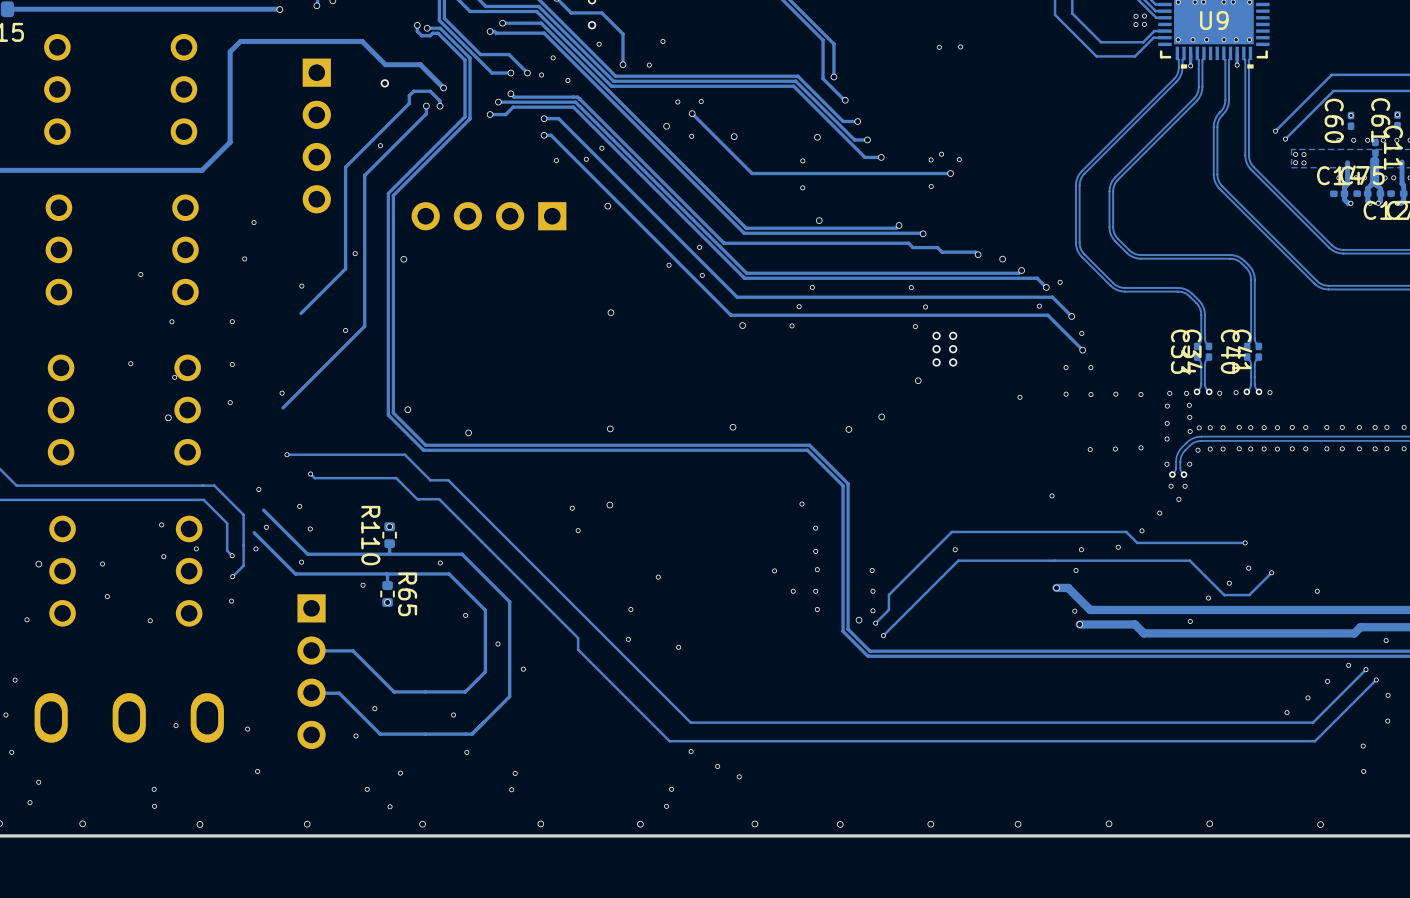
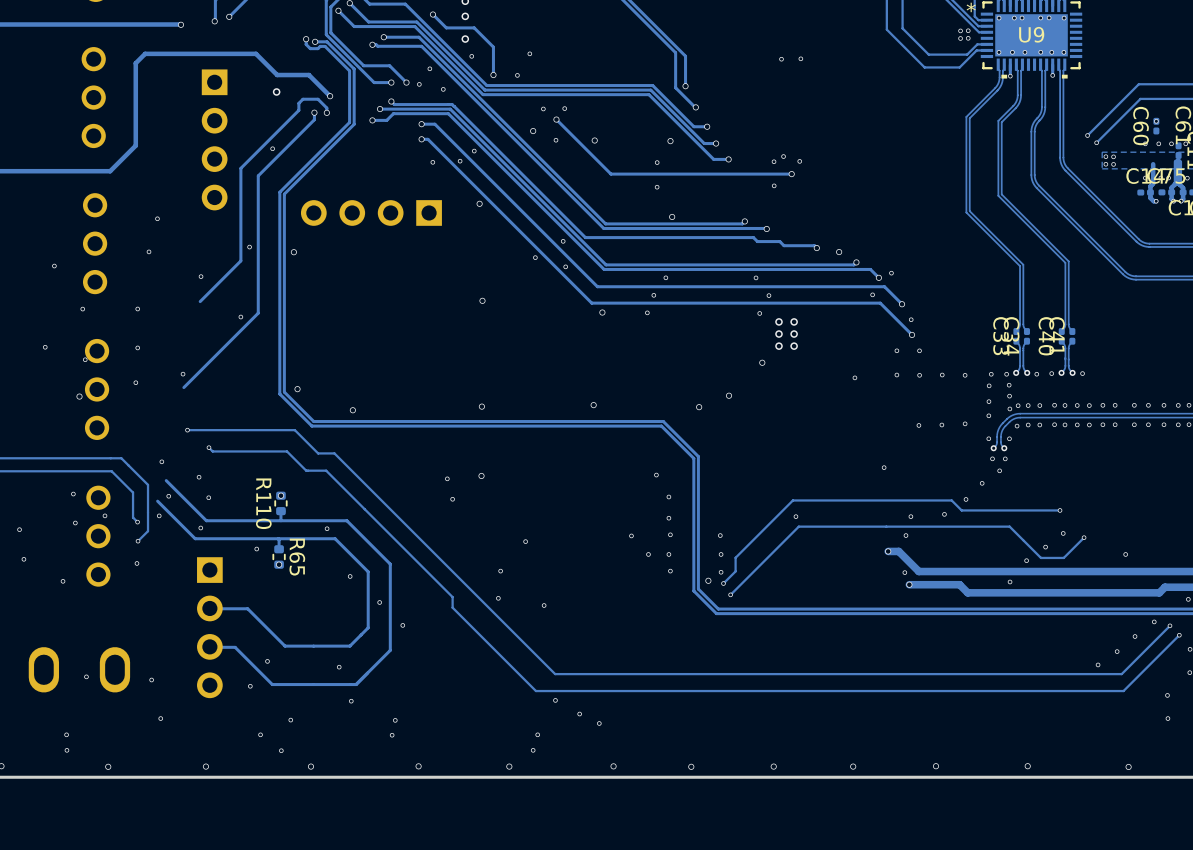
track: (1142, 110) (1078, 175) (1075, 185) (1076, 247) (1081, 256) (1114, 288) (1124, 291) (1182, 292) (1197, 304) (1201, 314) -> (966, 116) (966, 212) (1020, 266) (1020, 302)
track: (1146, 112) (1081, 177) (1079, 185) (1080, 247) (1084, 254) (1117, 285) (1124, 287) (1183, 288) (1190, 292) (1200, 302) (1204, 314) -> (969, 118) (969, 211) (1023, 264) (1023, 302)
track: (1177, 115) (1111, 181) (1109, 191) (1111, 234) (1126, 252) (1135, 257) (1233, 259) (1239, 261) (1247, 269) (1251, 279) -> (998, 120) (998, 195) (1065, 262) (1065, 270)
track: (1181, 116) (1115, 183) (1113, 191) (1114, 233) (1129, 250) (1137, 254) (1235, 255) (1250, 266) (1254, 279) -> (1001, 122) (1001, 194) (1068, 261) (1068, 270)

